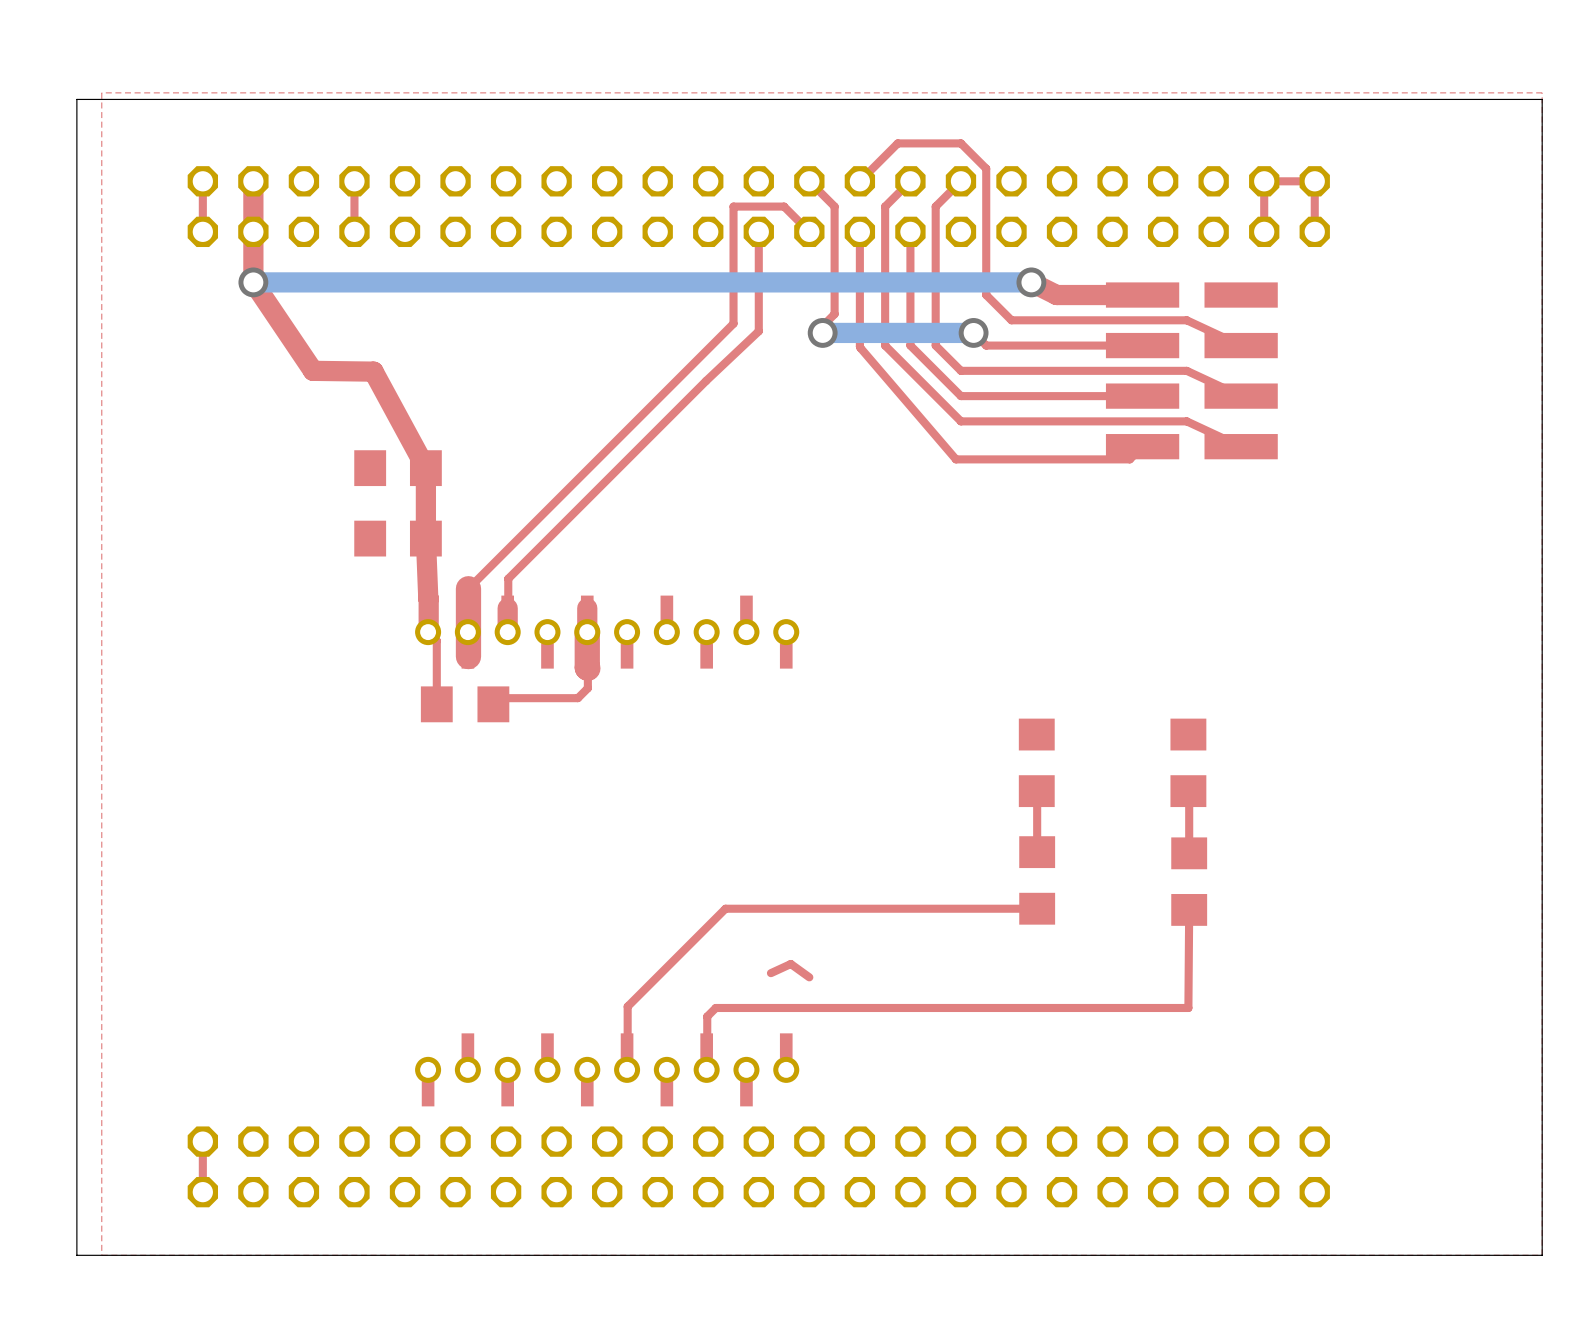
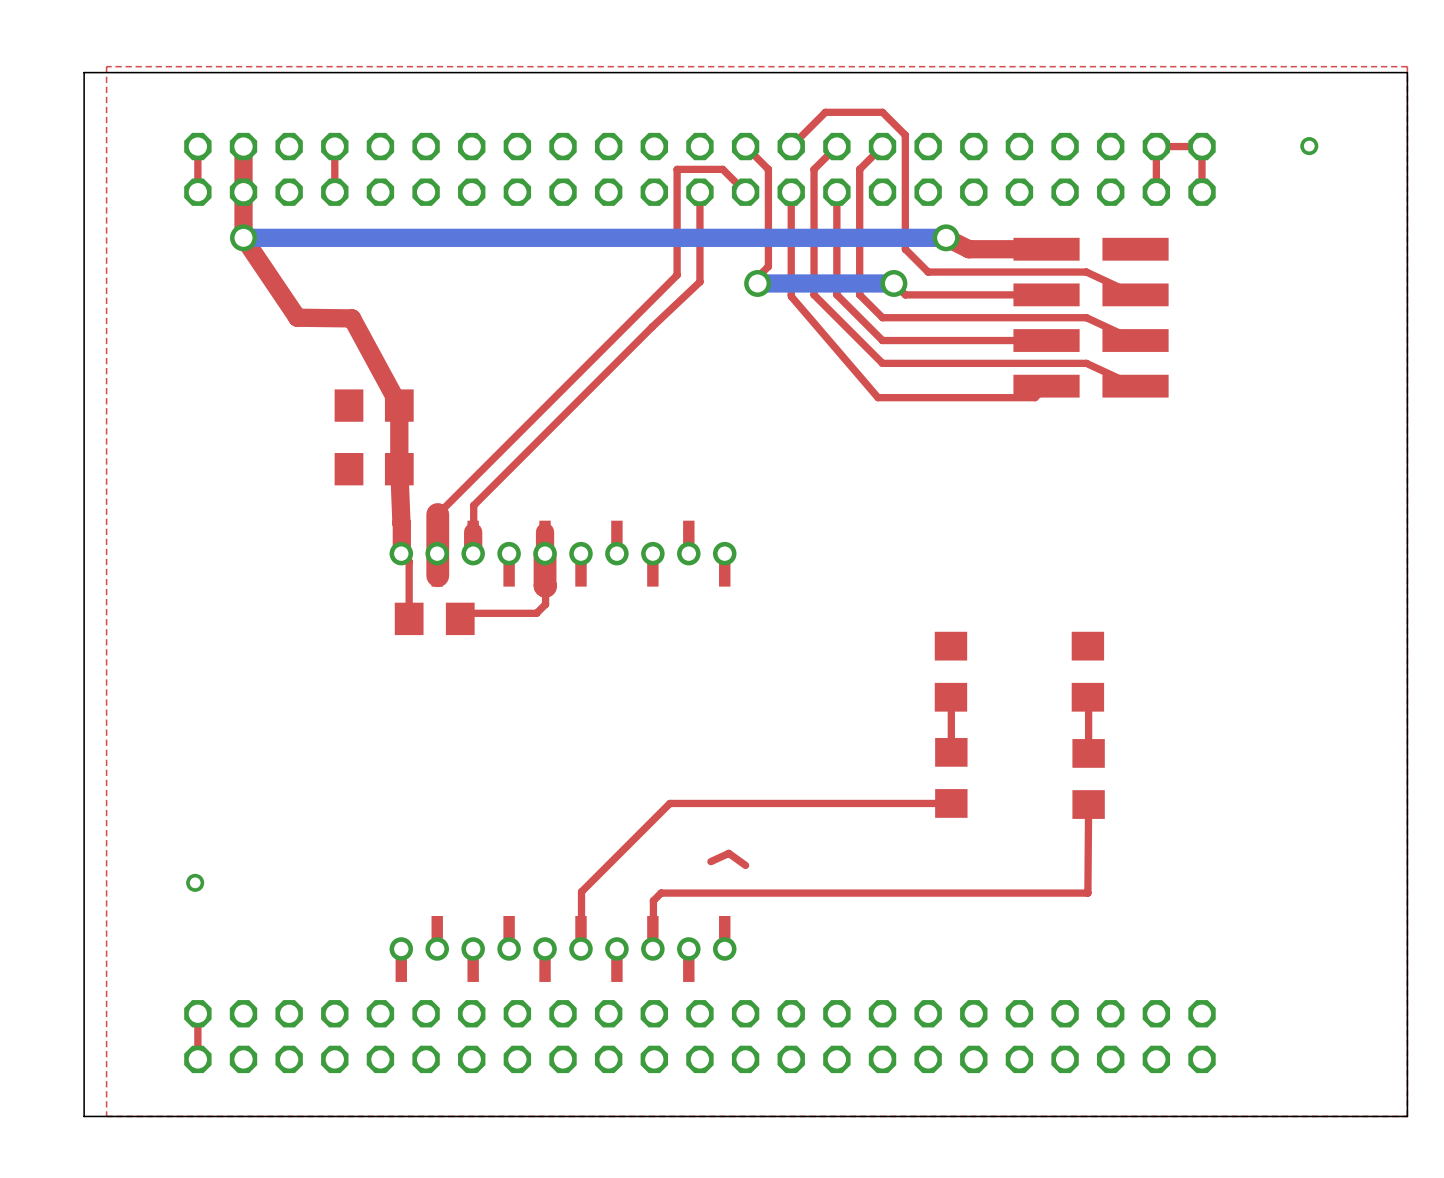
via: none -> (1309, 146)
via: none -> (195, 882)

